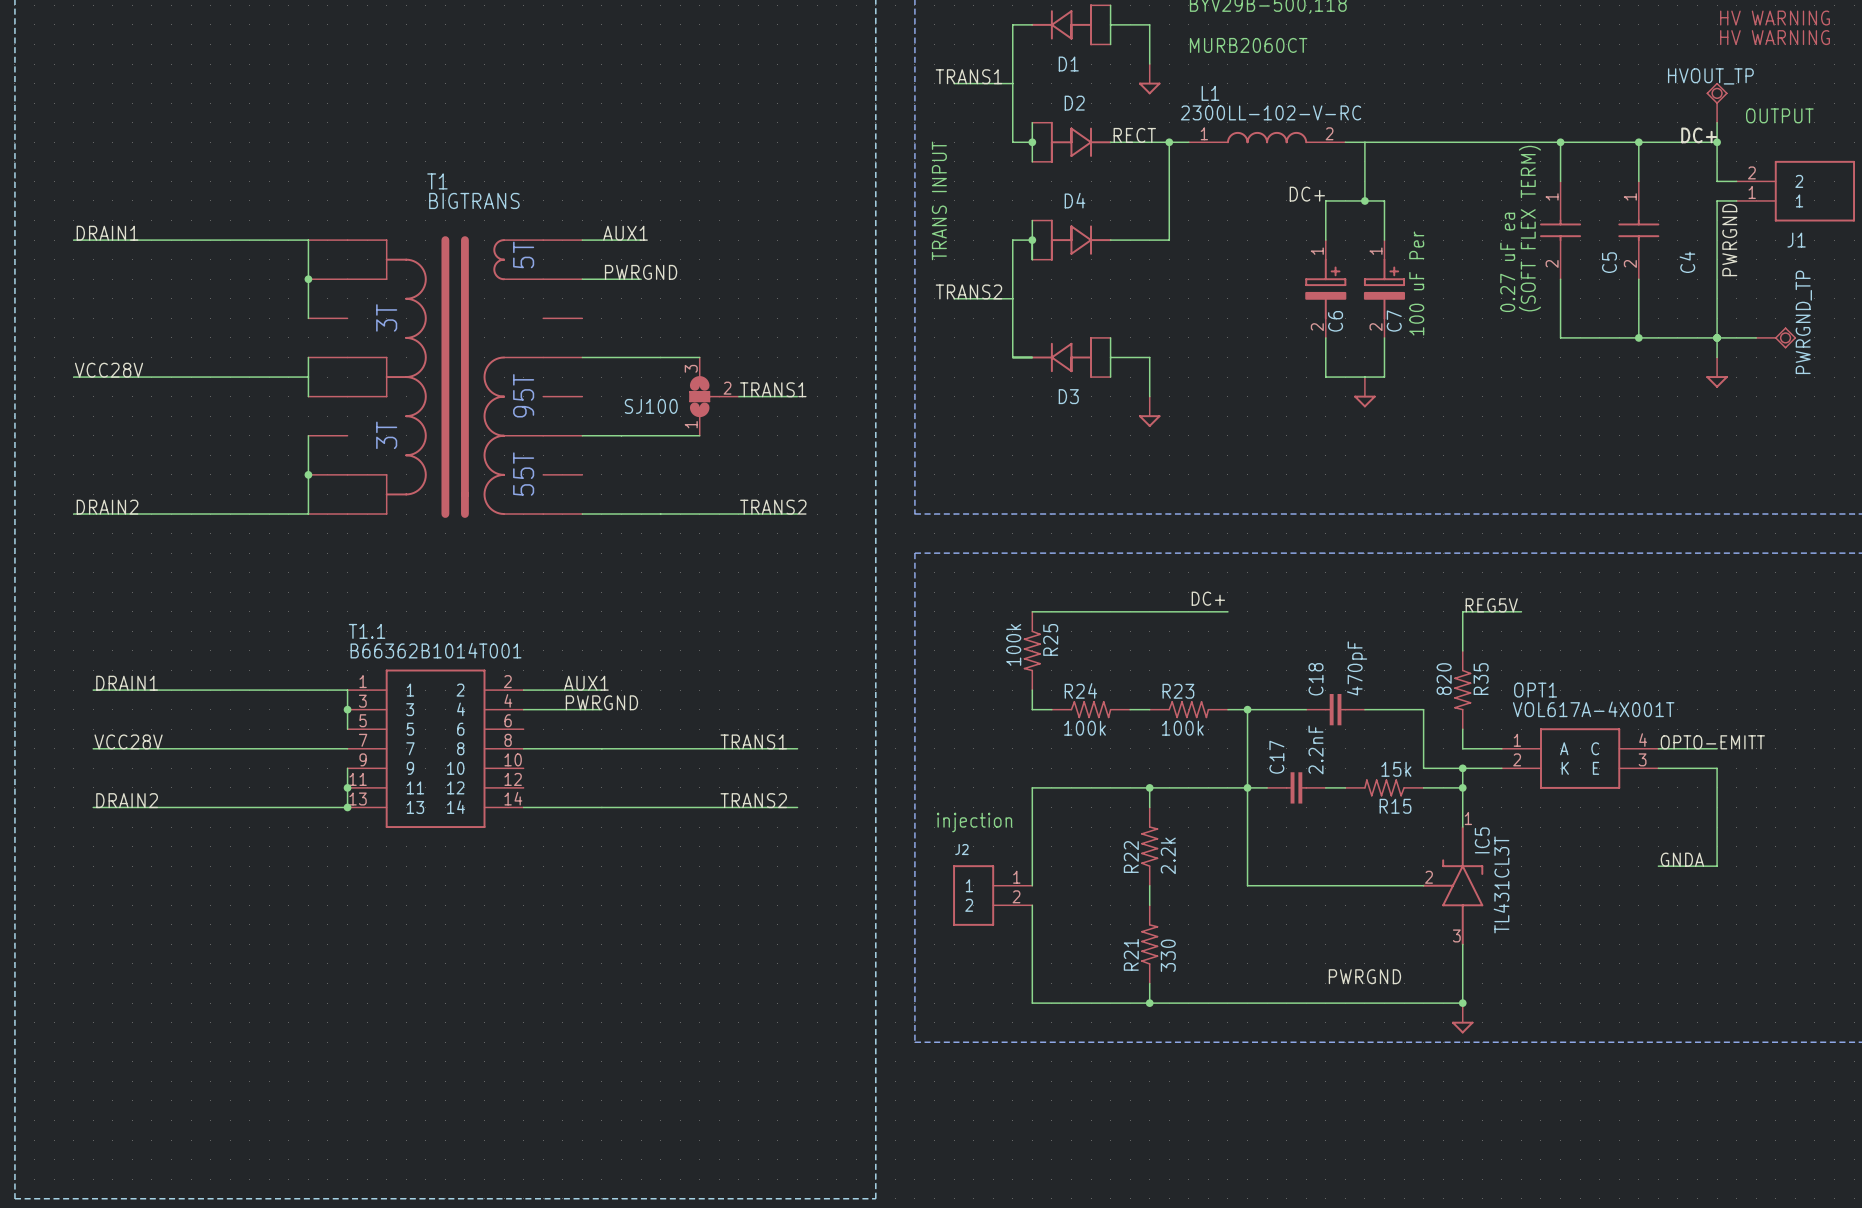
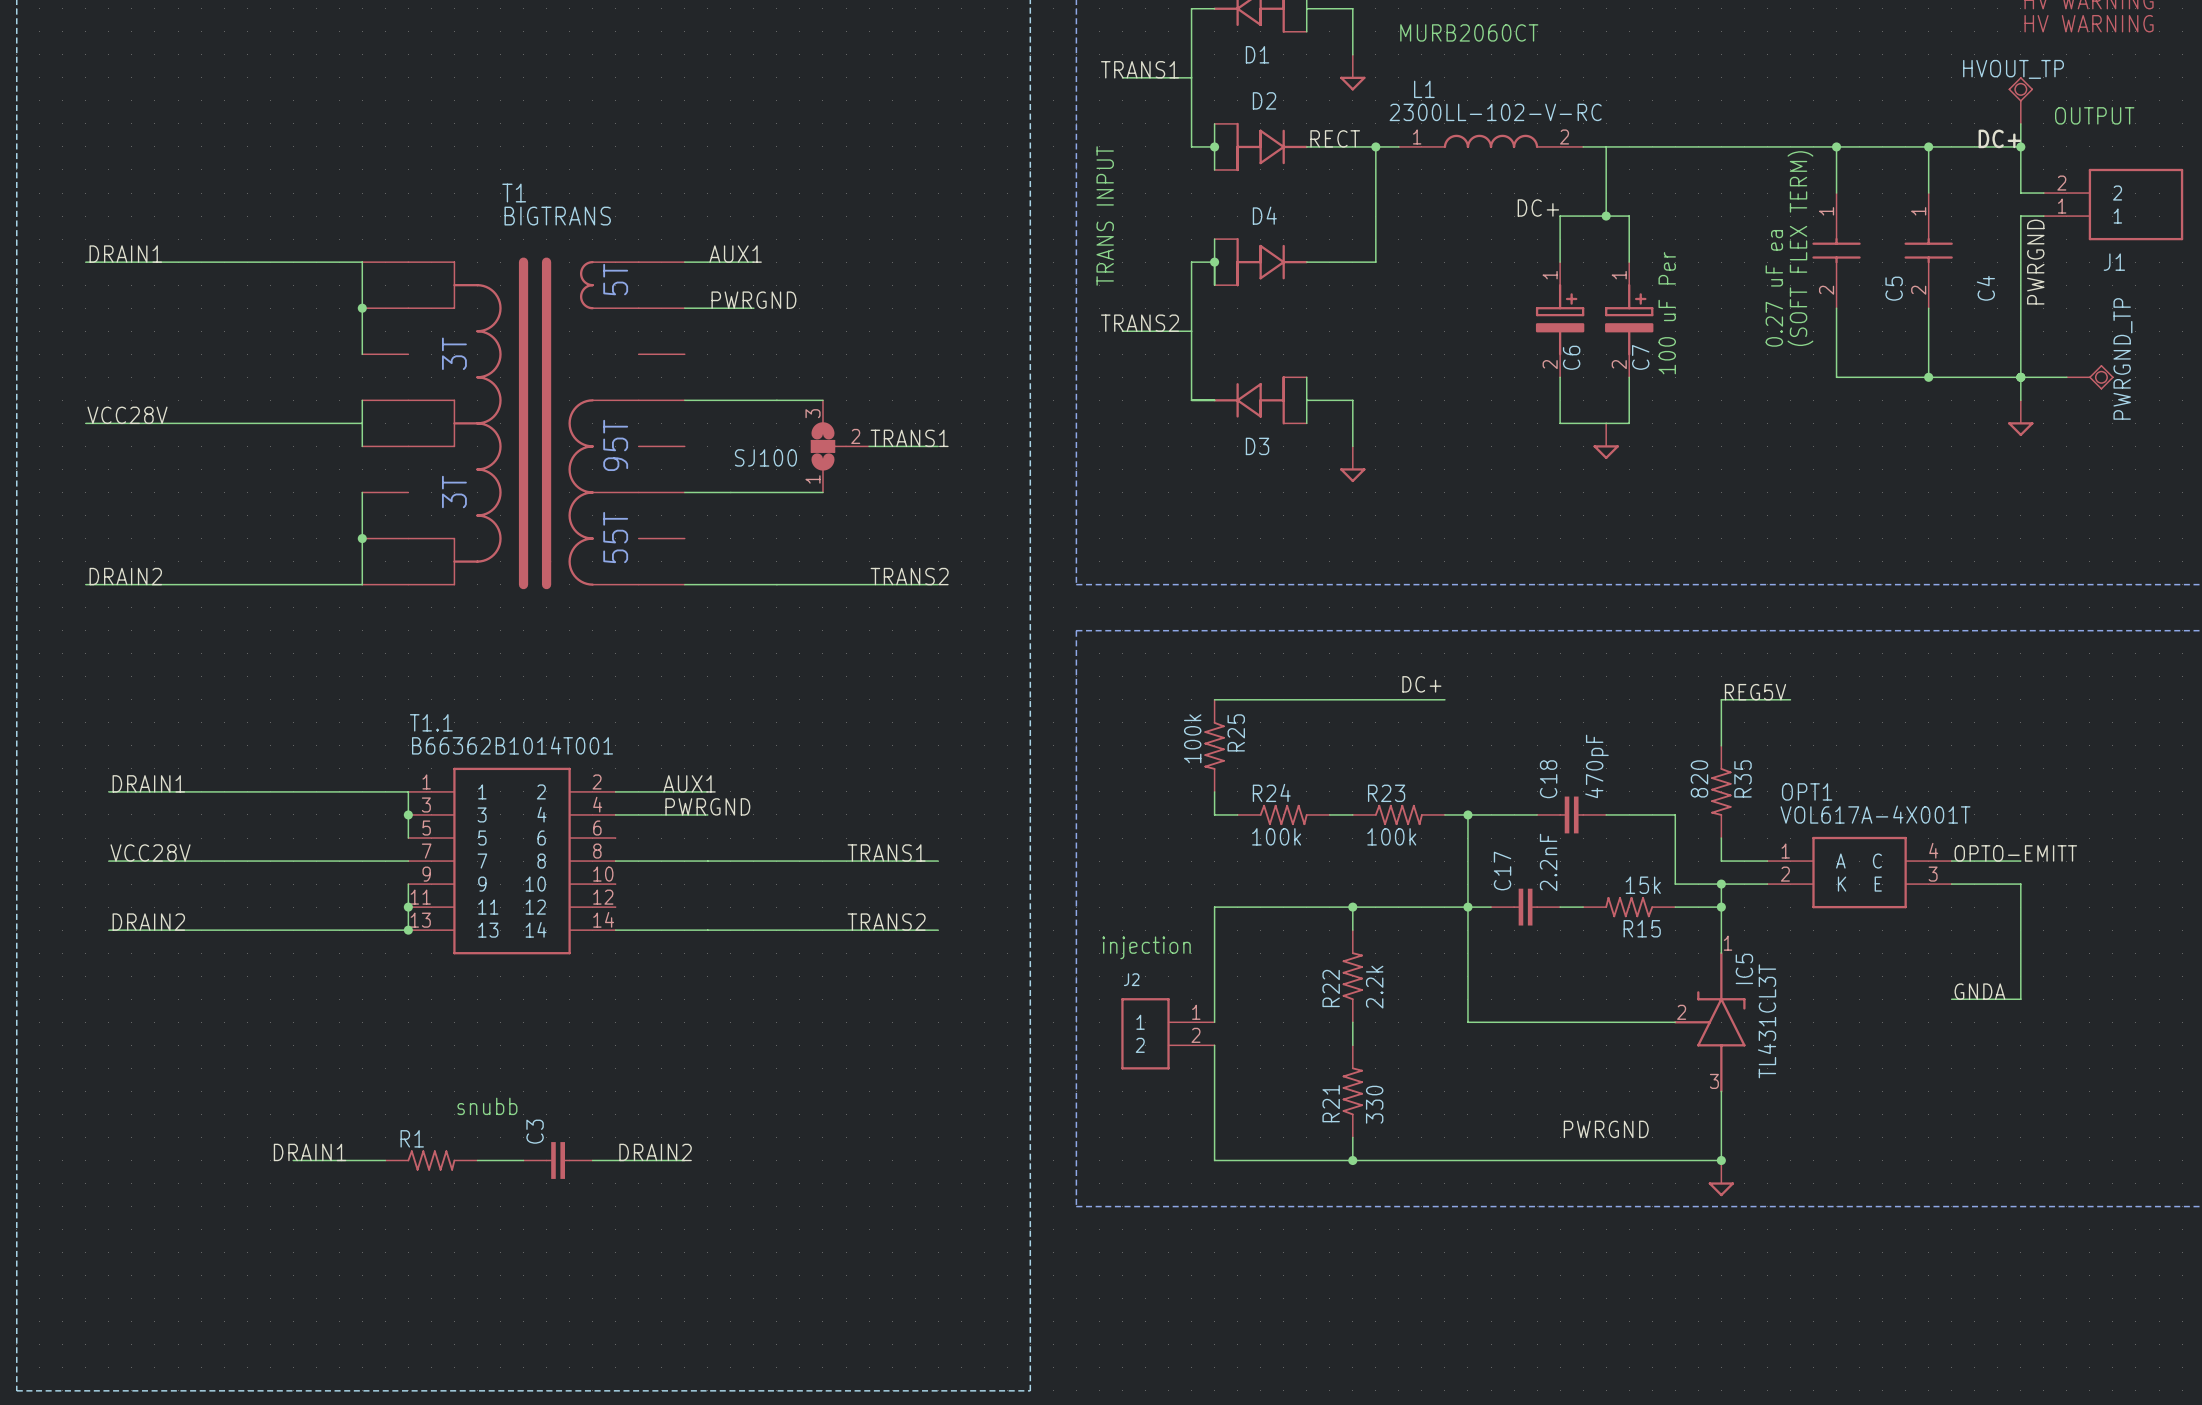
text: none -> snubb (487, 1106)
label: none -> DRAIN1 (310, 1152)
label: none -> DRAIN2 (655, 1152)
wire: none -> (293, 1160) (385, 1160)
R1: none -> (431, 1160)
wire: none -> (477, 1160) (523, 1160)
C3: none -> (558, 1160)
wire: none -> (592, 1160) (684, 1160)

